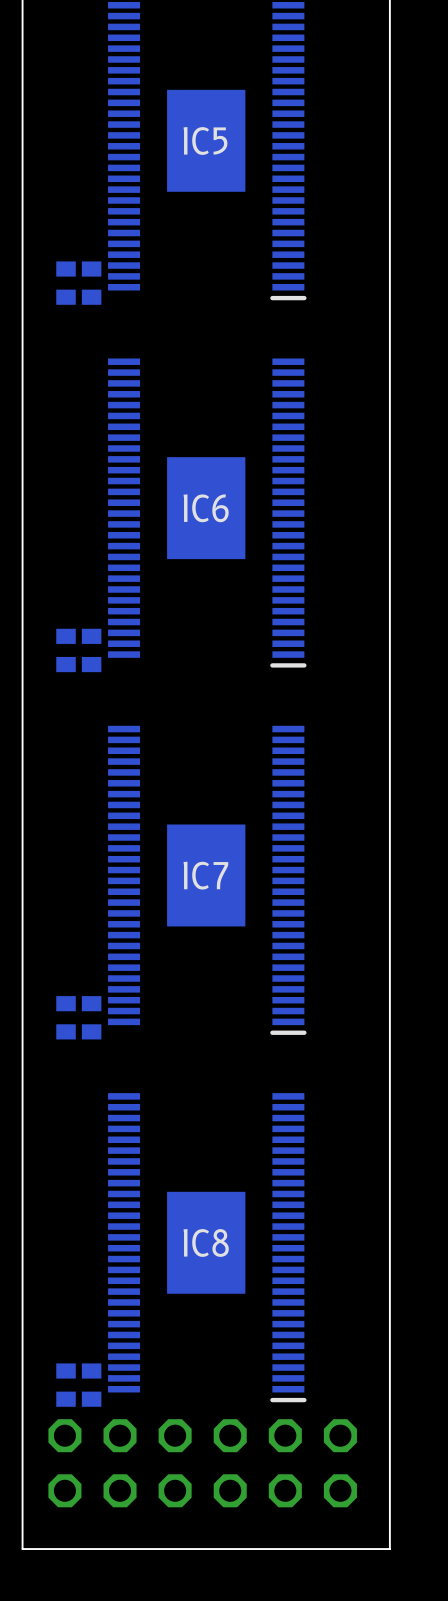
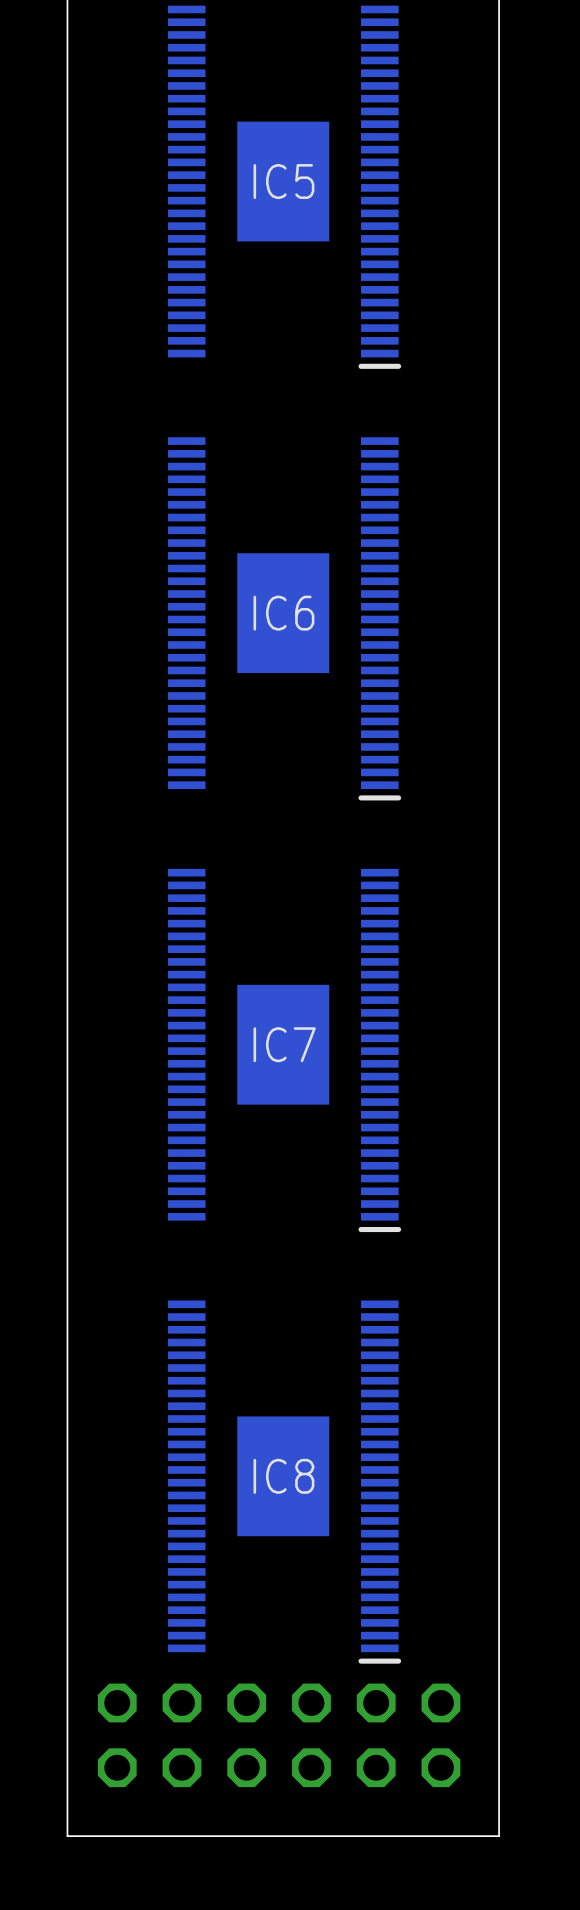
part: (66, 283) -> none
part: (91, 283) -> none
part: (66, 650) -> none
part: (91, 650) -> none
part: (66, 1017) -> none
part: (91, 1017) -> none
part: (66, 1385) -> none
part: (91, 1385) -> none

